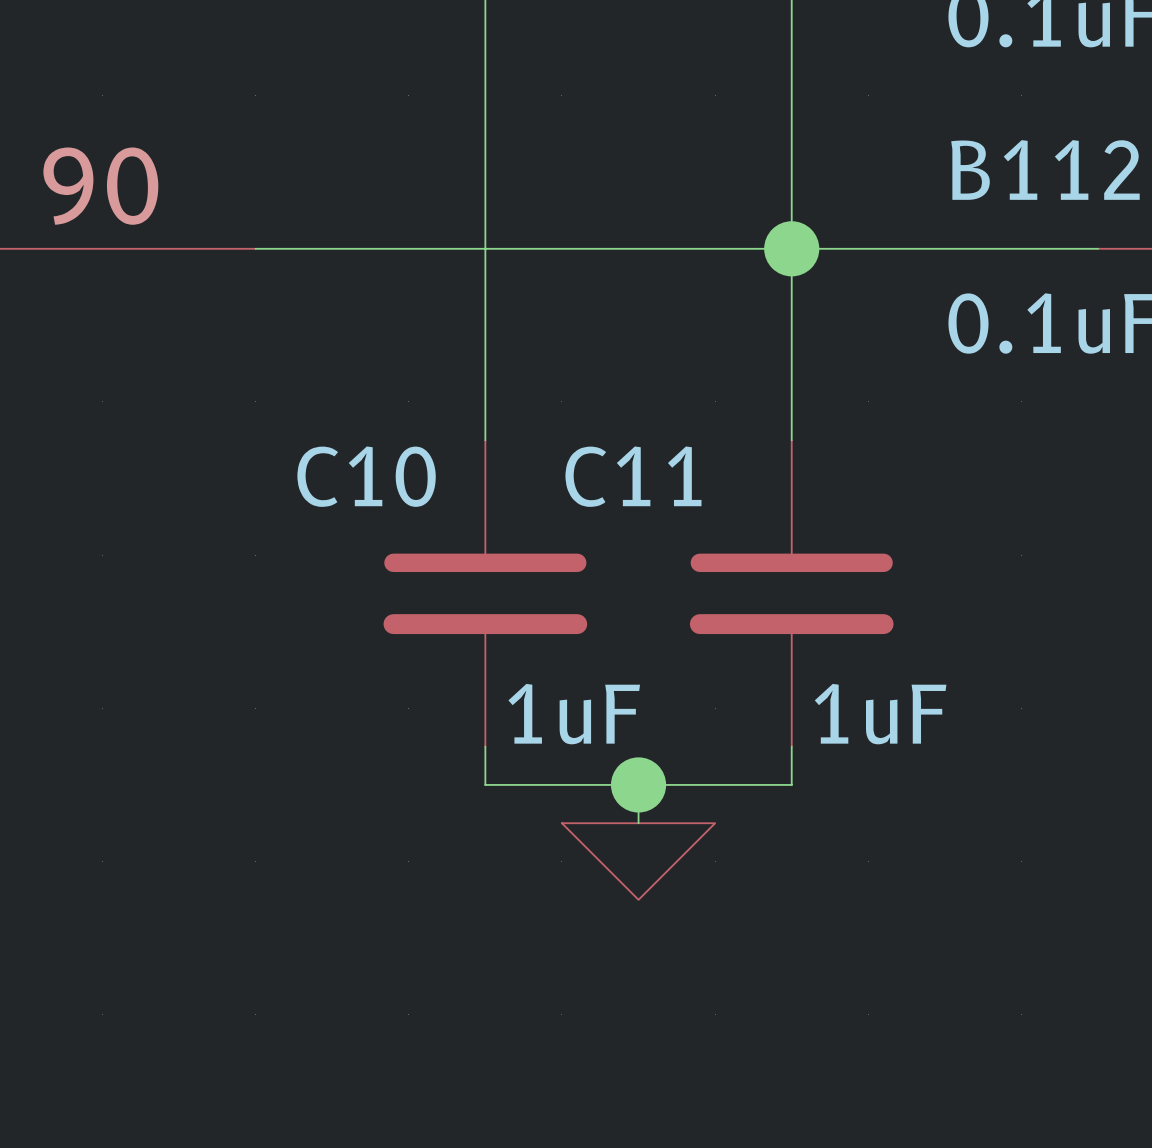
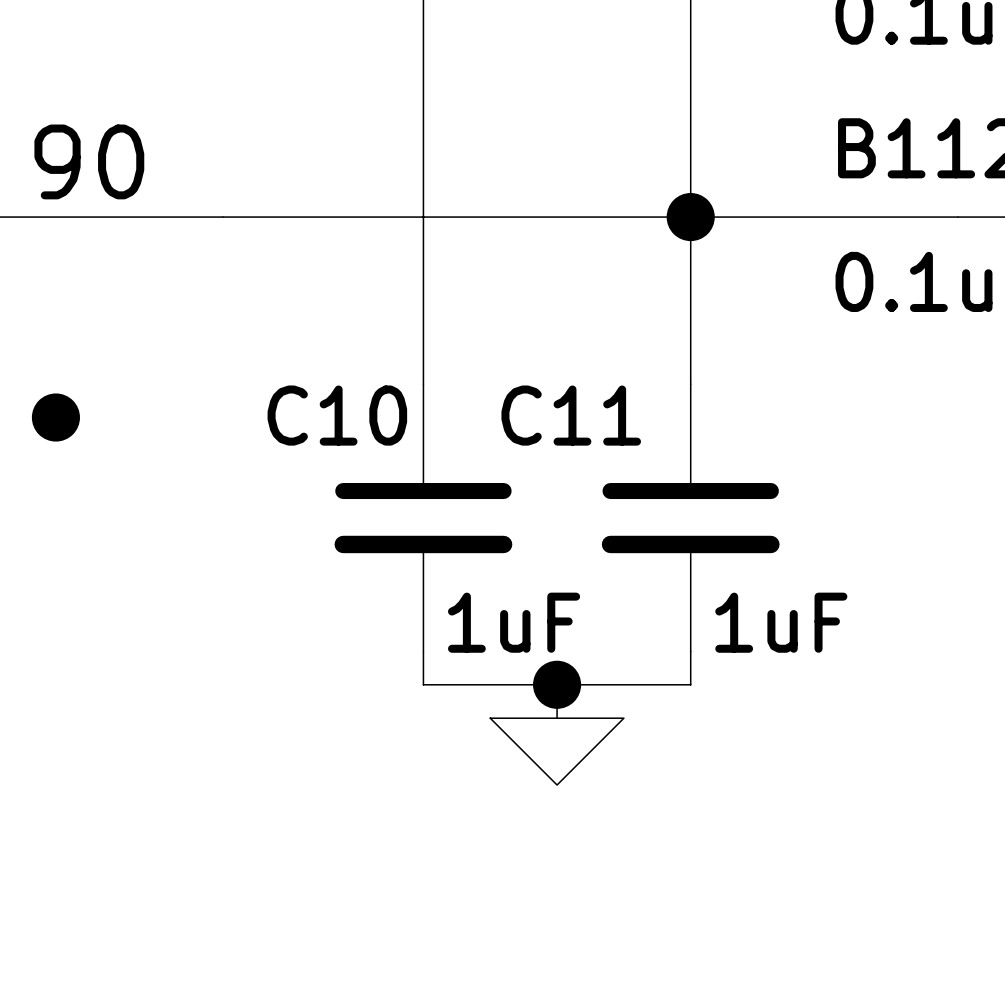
junction: none -> (55, 417)

